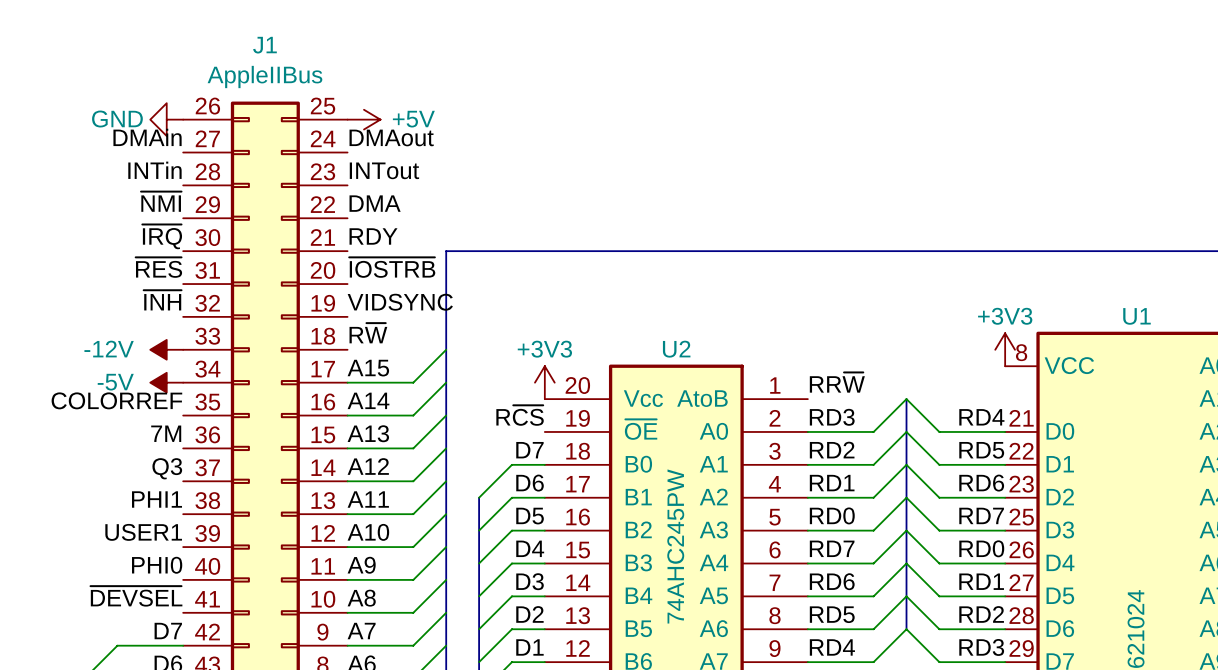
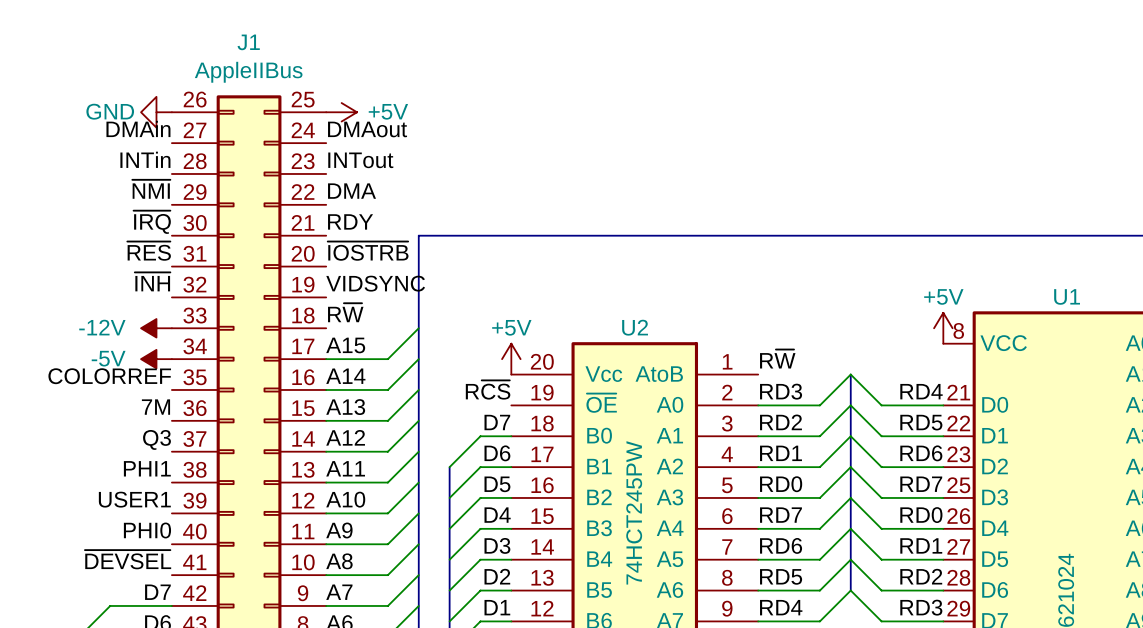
power symbol: +3V3 (1005, 349) -> +5V (943, 328)
power symbol: +3V3 (544, 382) -> +5V (511, 359)
label: RR~{W} (837, 382) -> R~{W} (777, 359)
U2 value: 74AHC245PW (675, 546) -> 74HCT245PW (634, 512)

